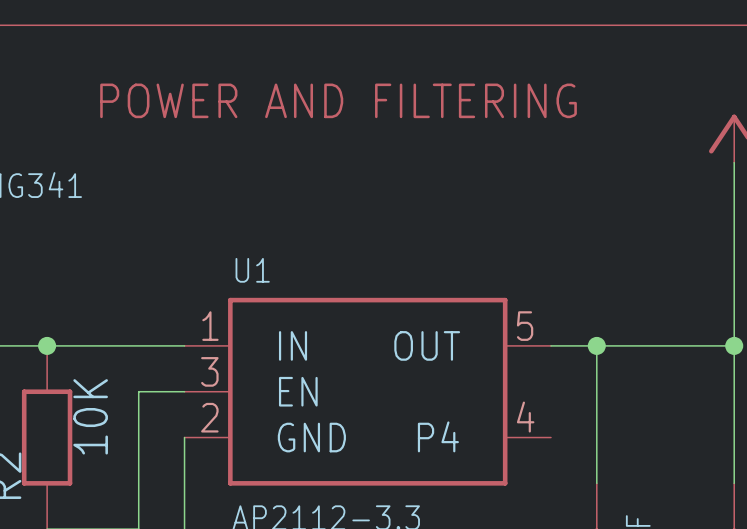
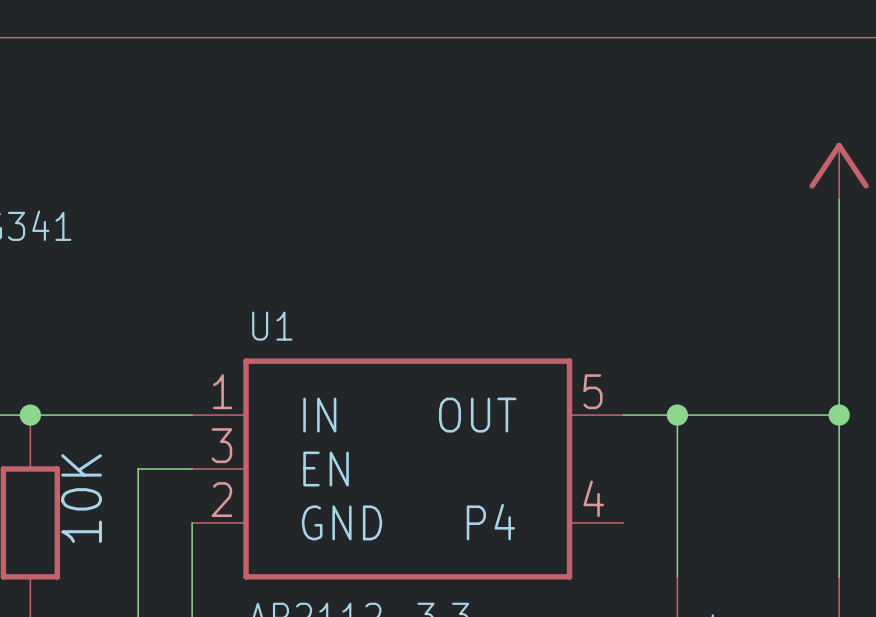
text: POWER AND FILTERING (338, 100) -> none

